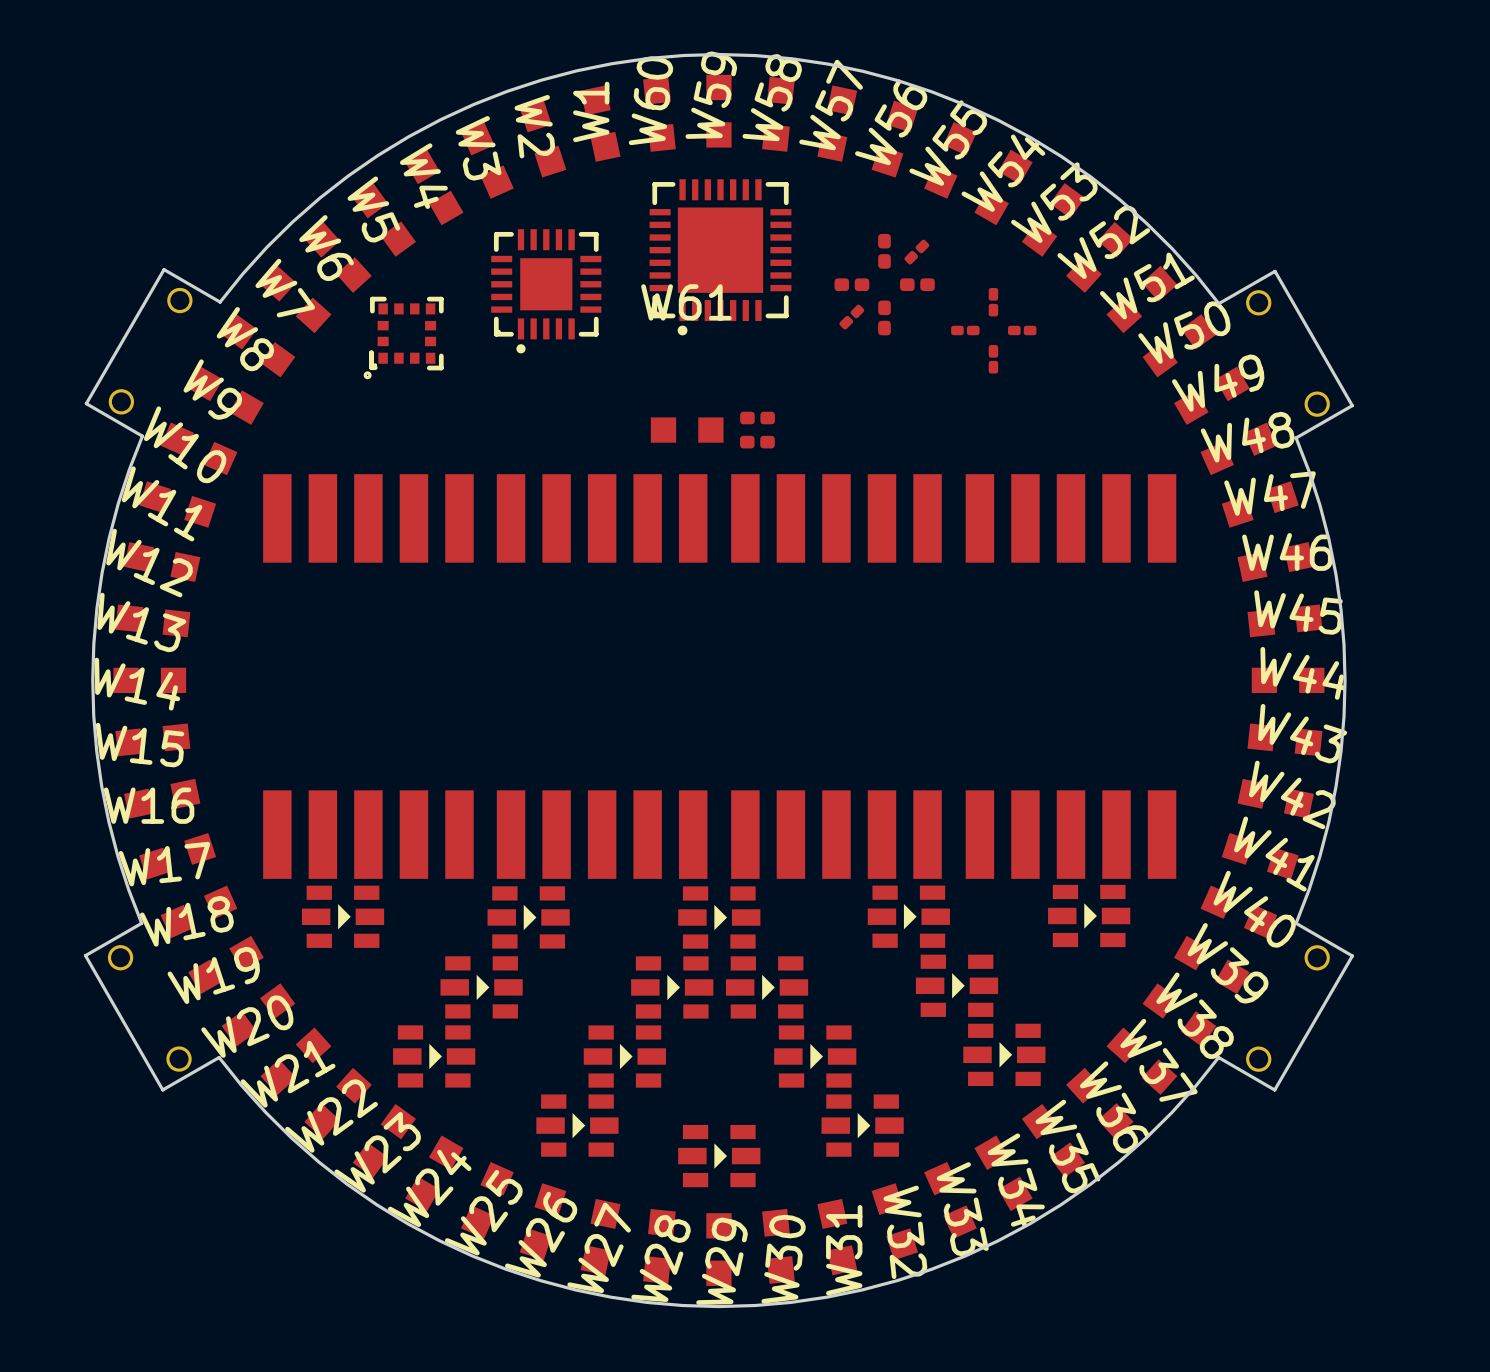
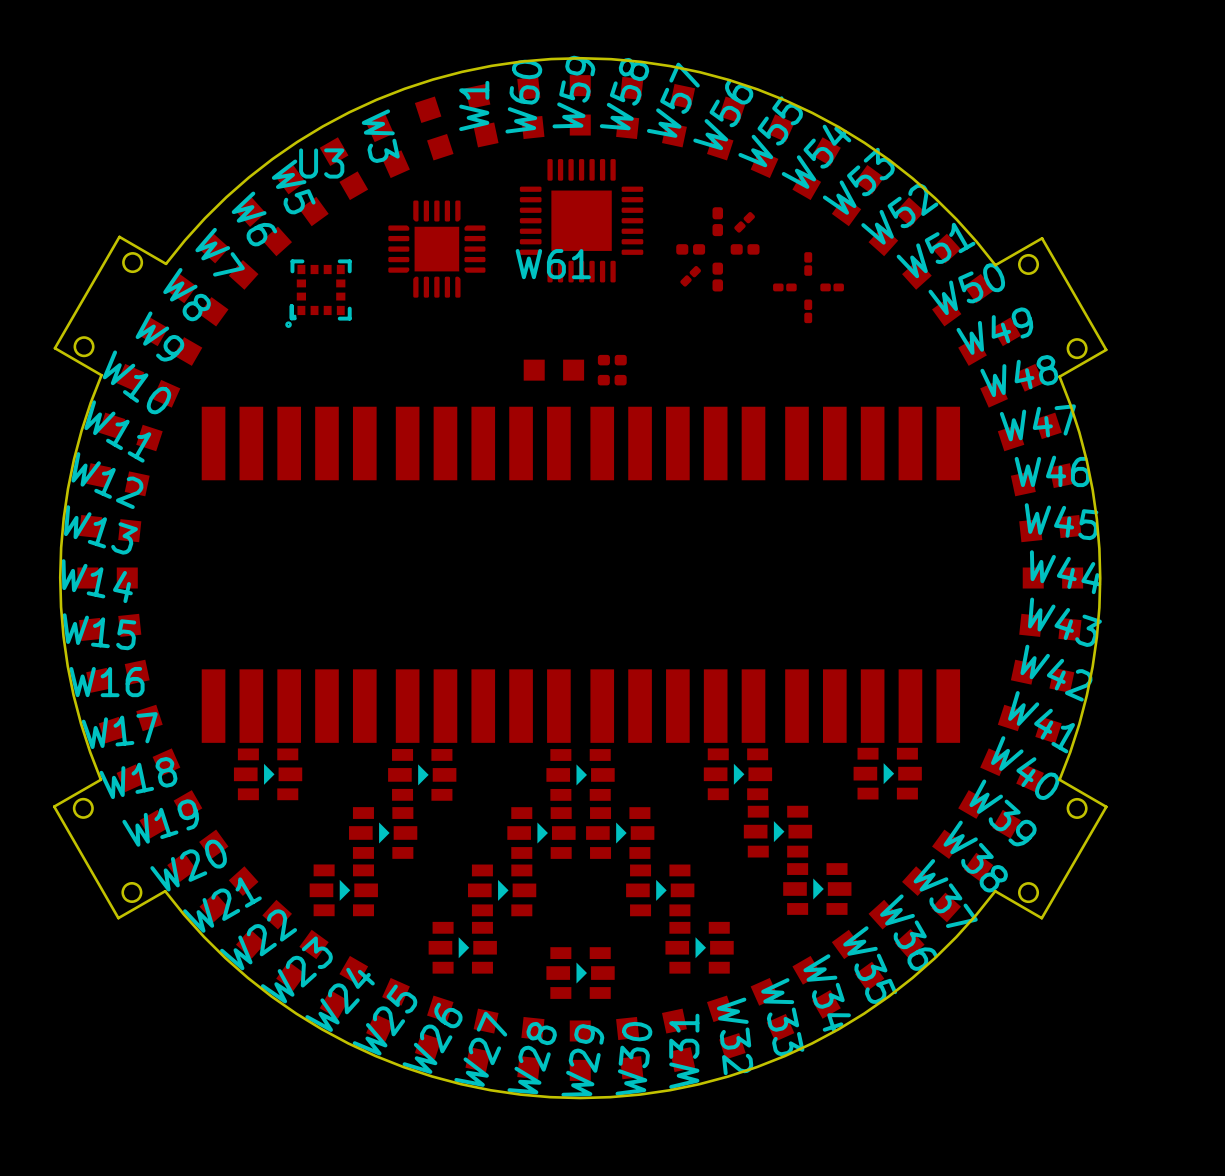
W2 name: W2 (534, 126) -> none
W4 name: W4 (423, 176) -> none
part footprint: [649, 179, 792, 336] -> [519, 159, 644, 283]
U3 name: none -> U3 (321, 163)
part footprint: [491, 229, 602, 354] -> [388, 200, 486, 298]

